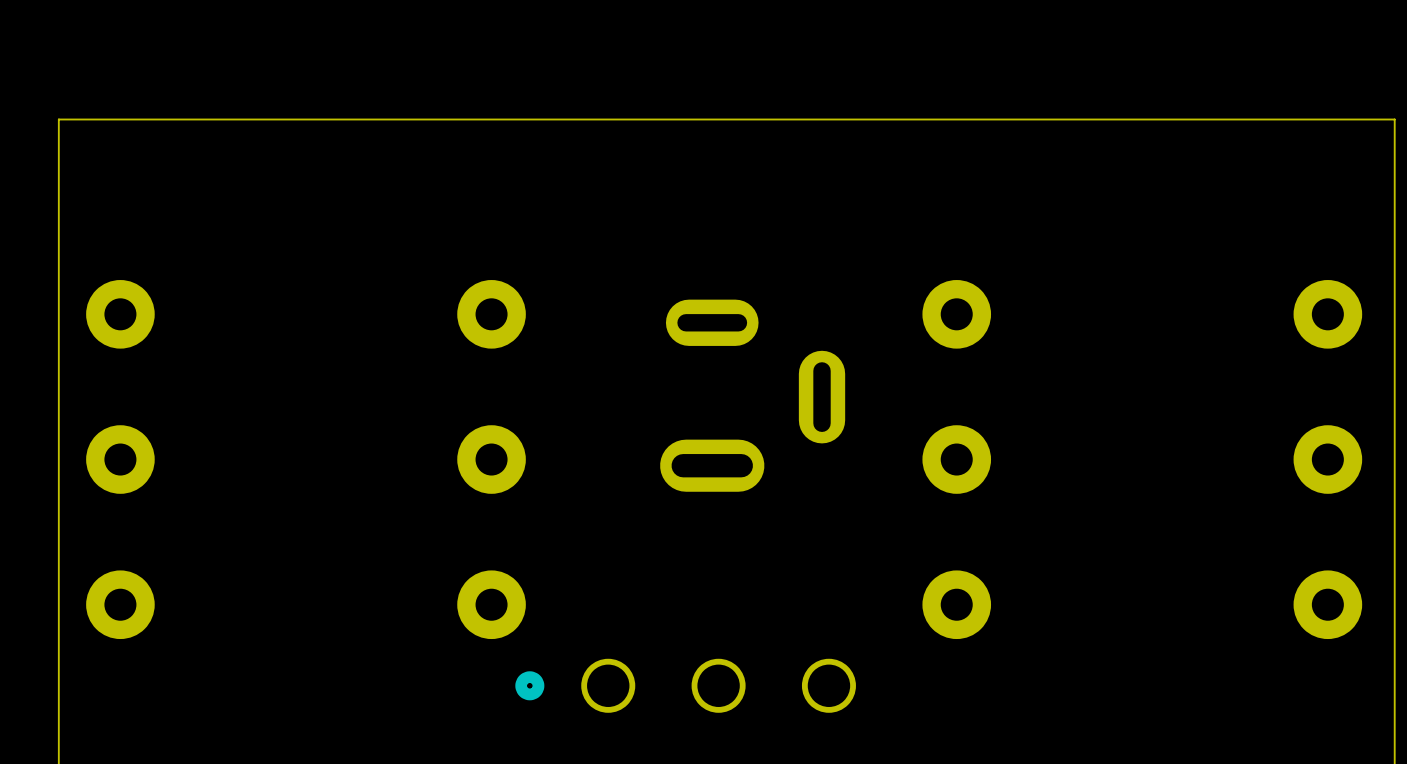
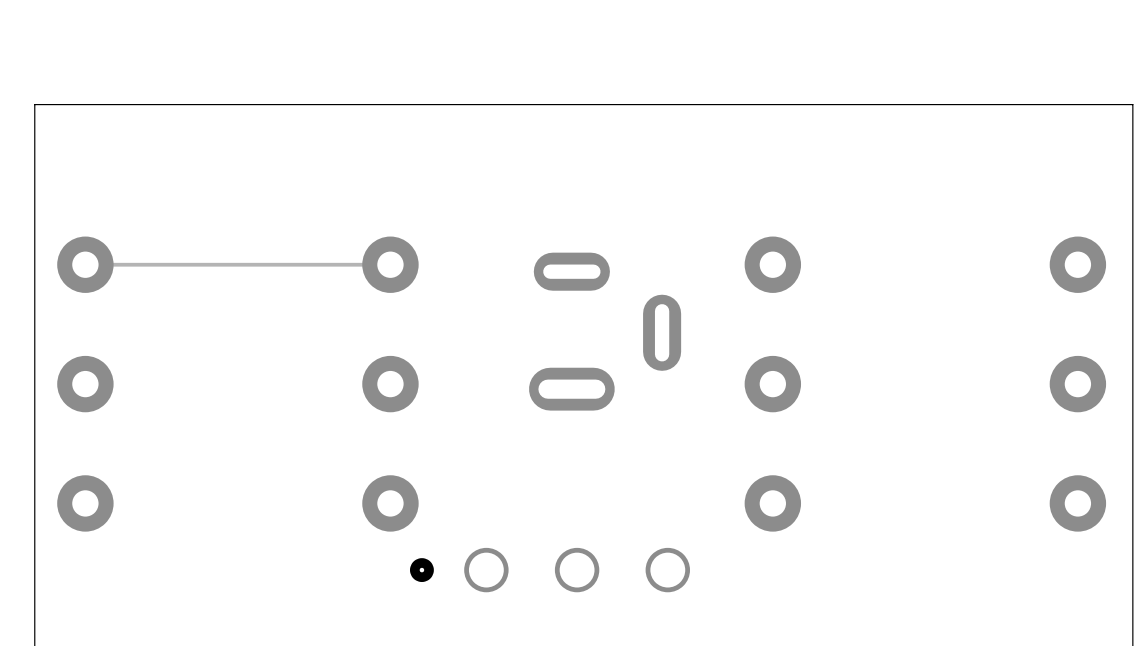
track: none -> (390, 264) (85, 264)

